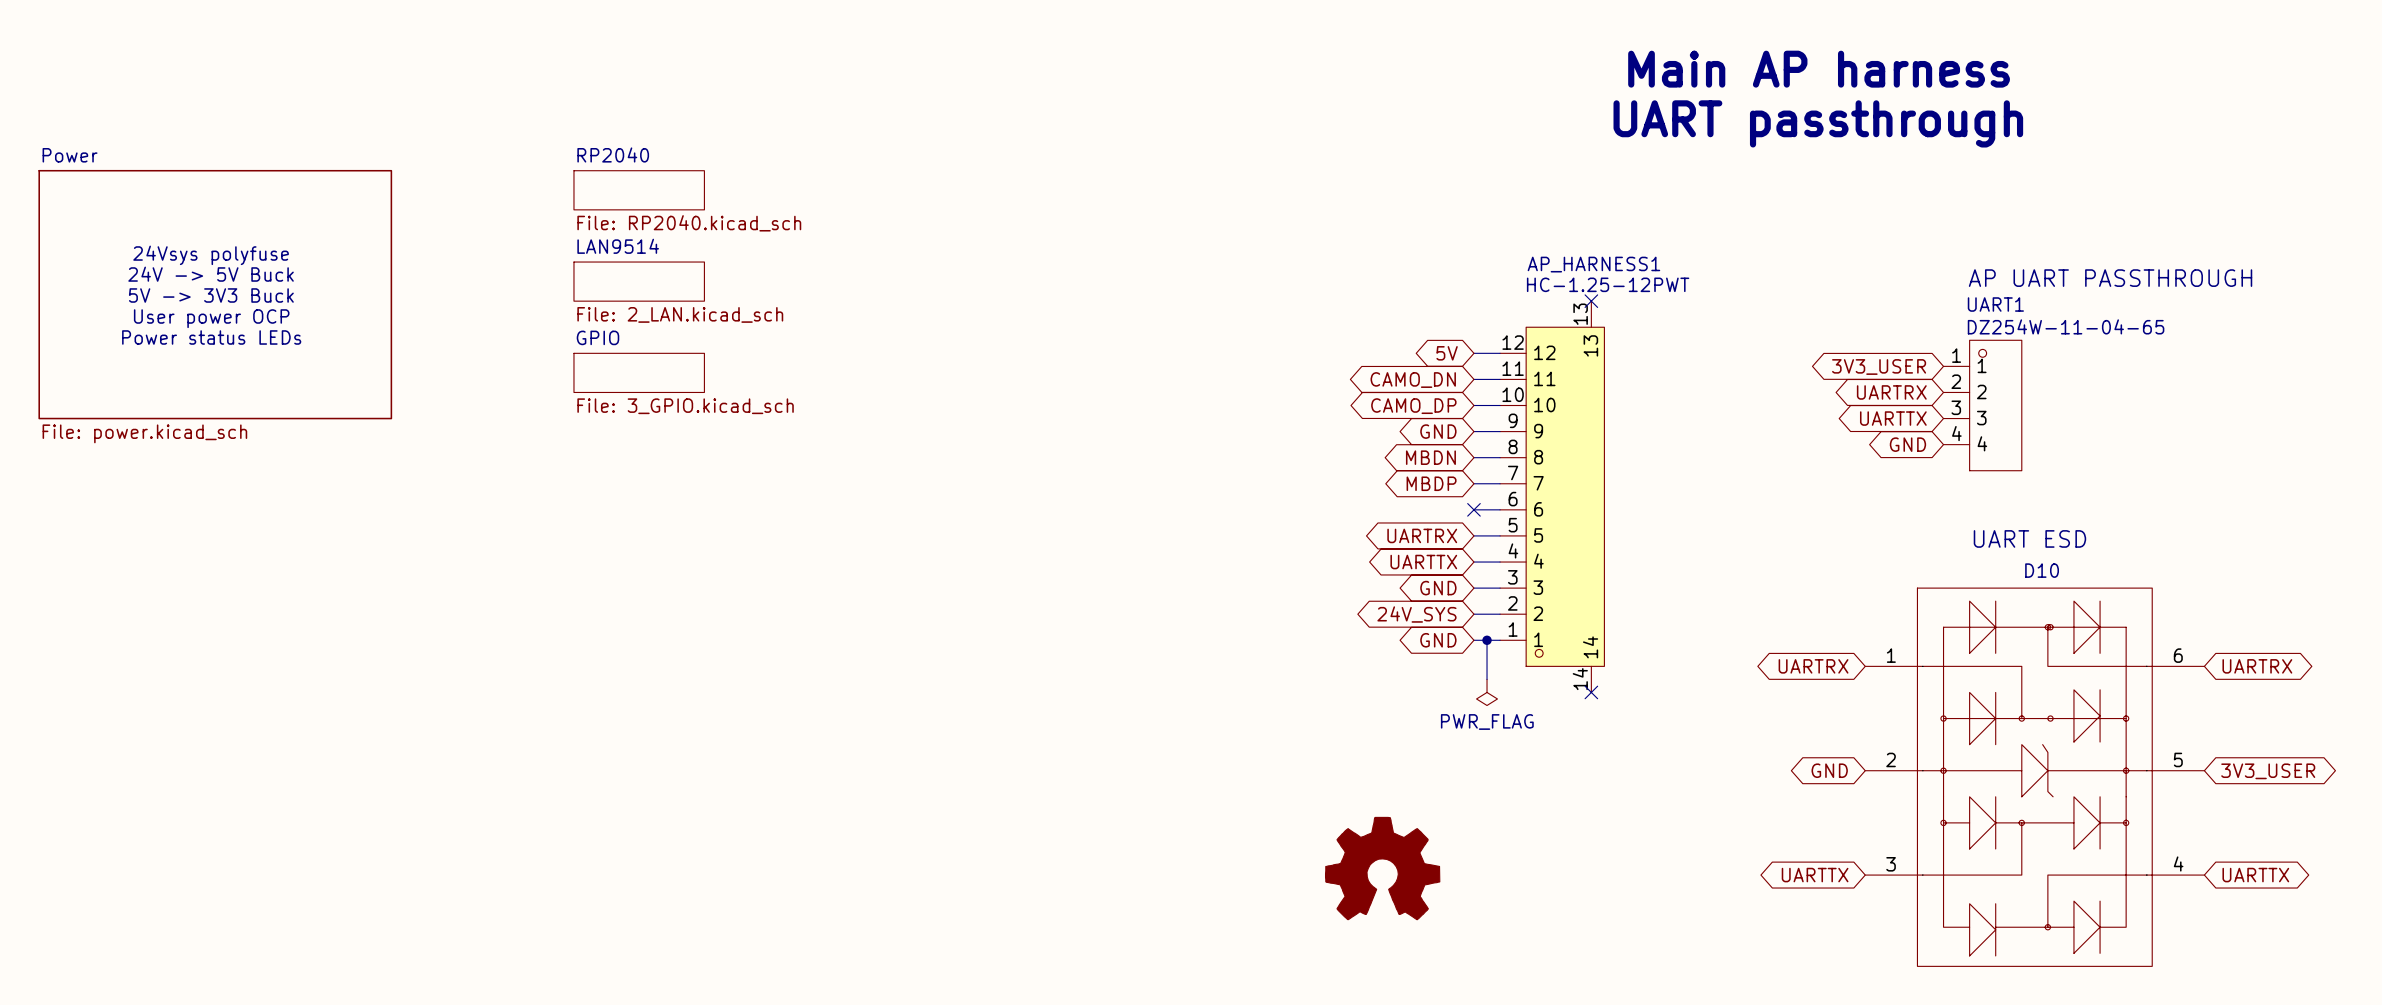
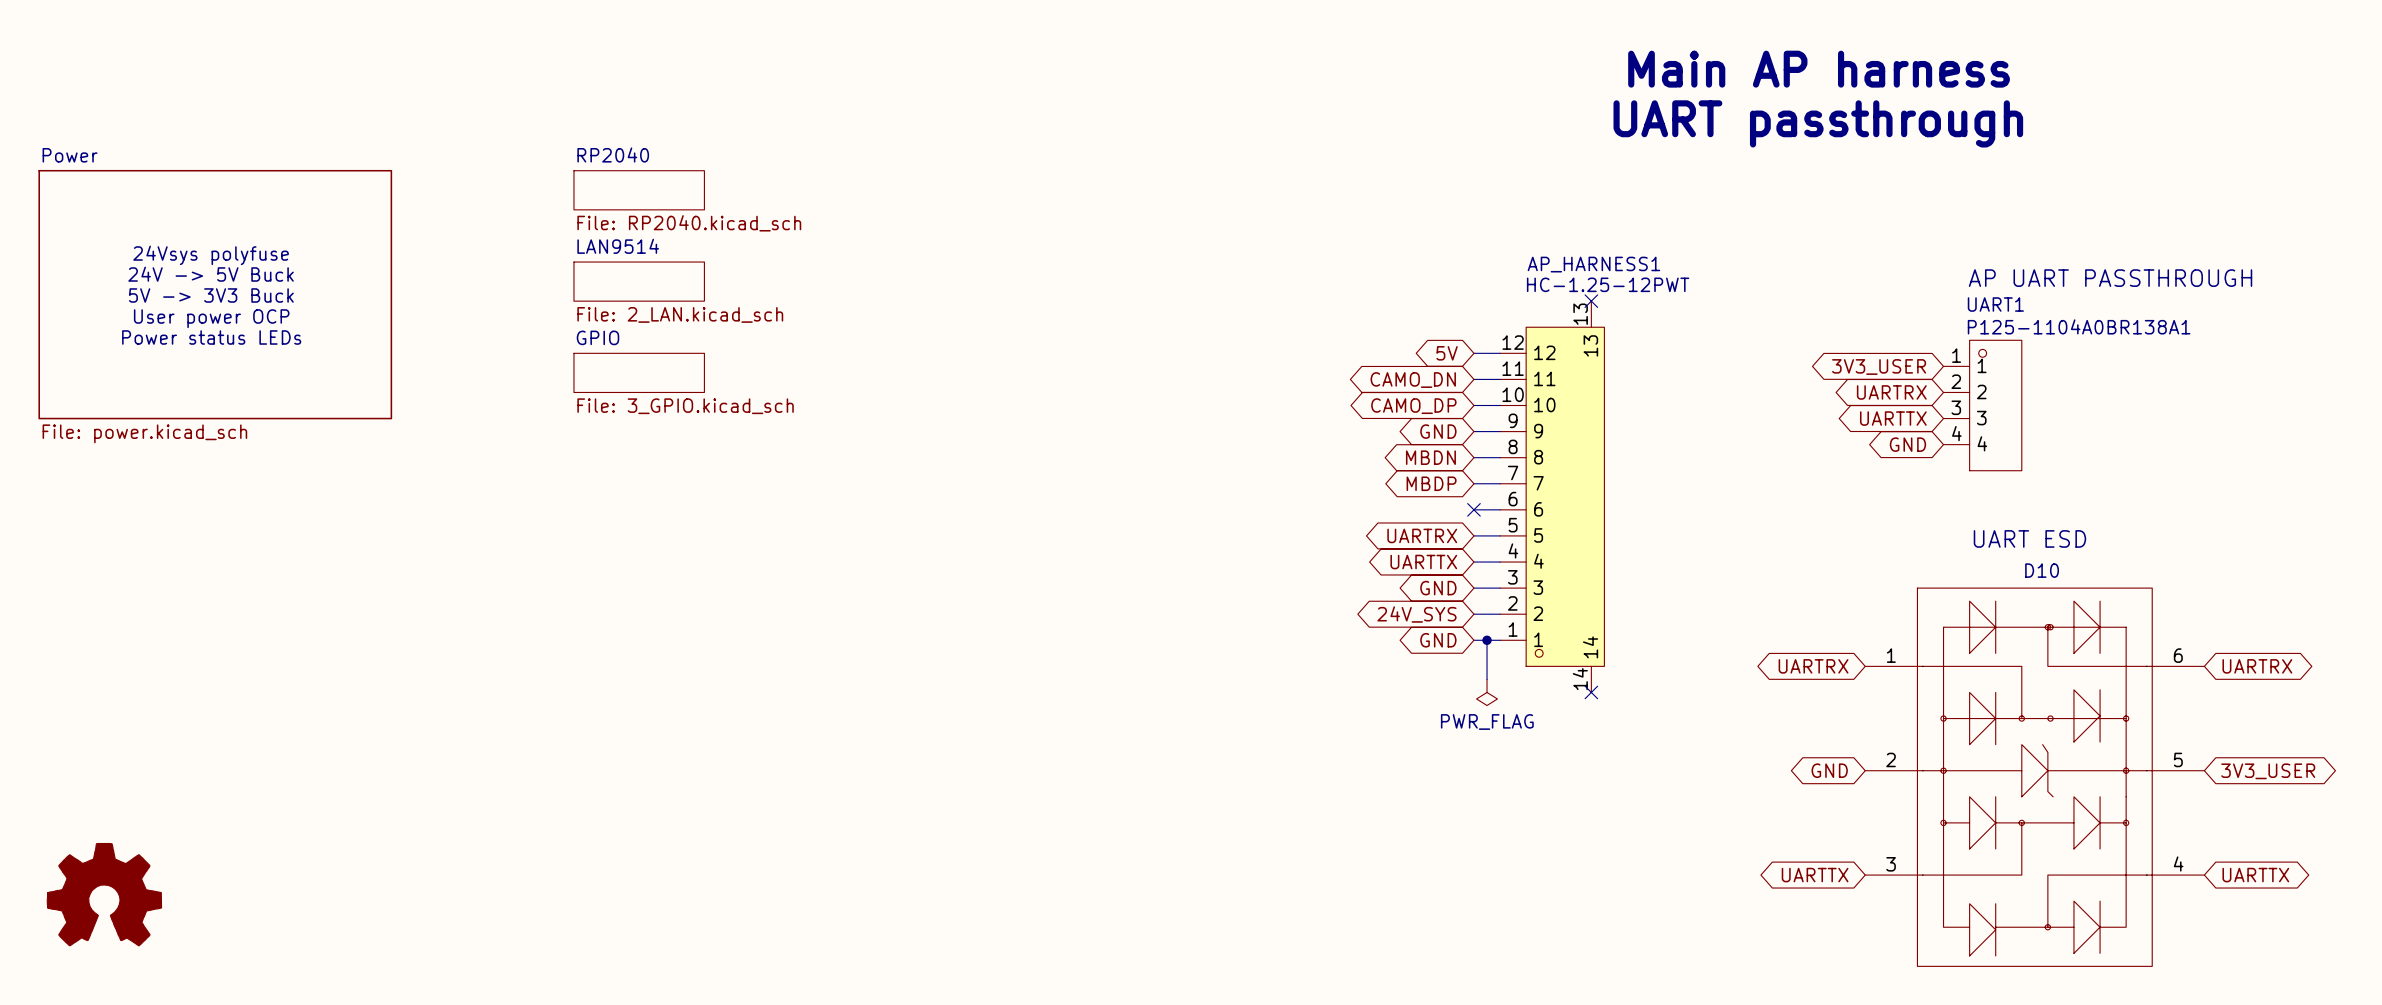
UART1 value: DZ254W-11-04-65 (2066, 326) -> P125-1104A0BR138A1 (2079, 326)
power symbol: (1382, 868) -> none
power symbol: none -> (104, 894)

